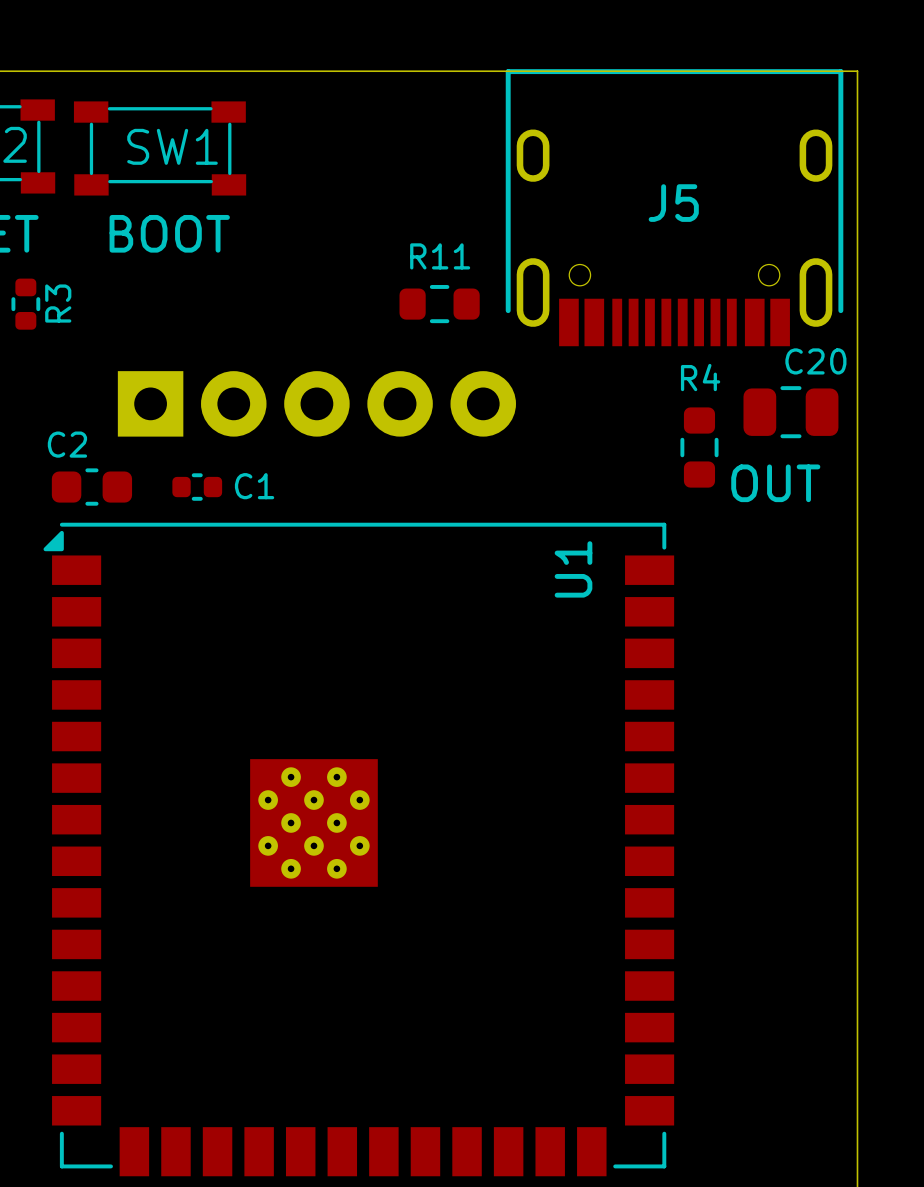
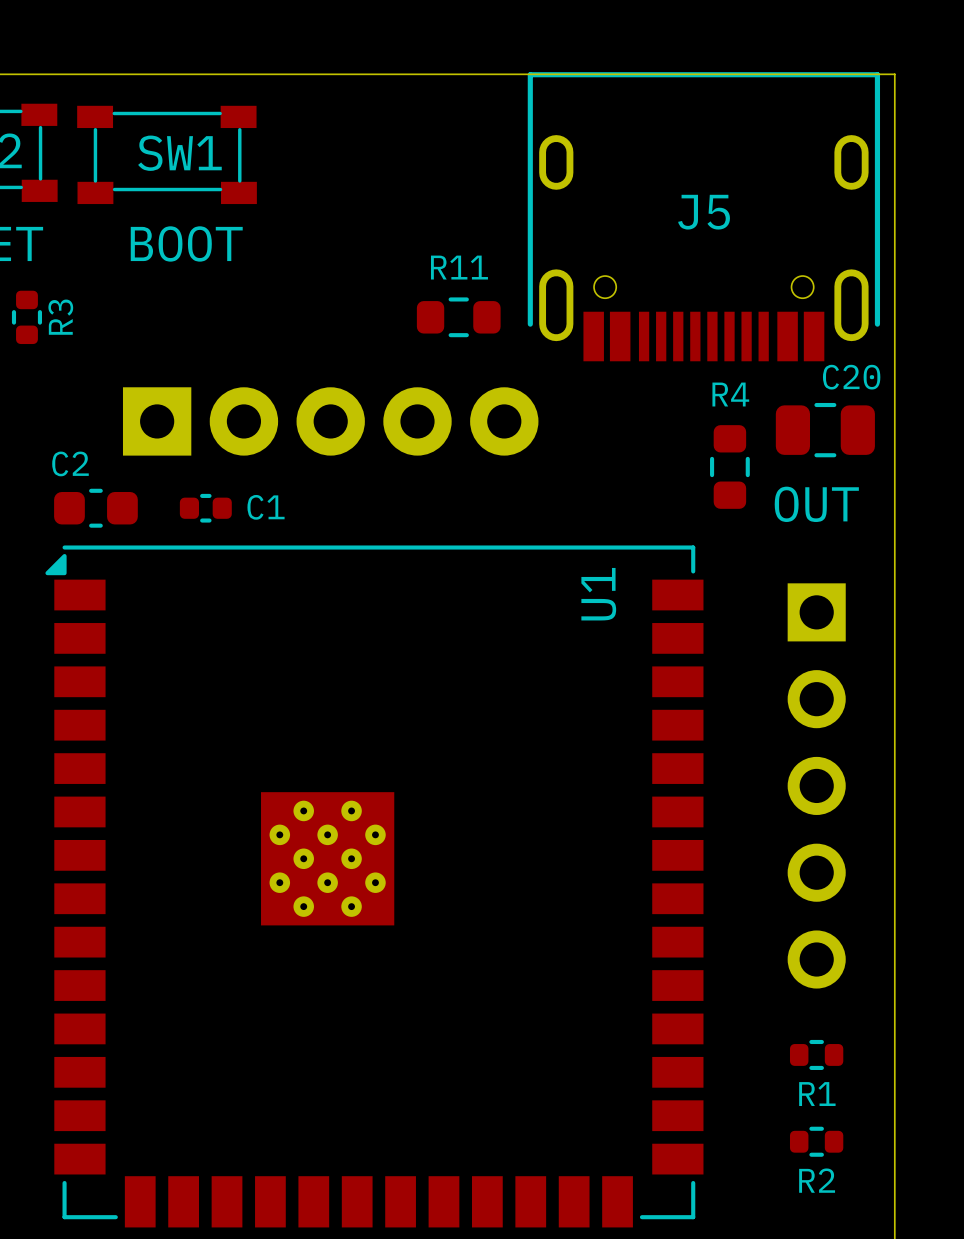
part: none -> (816, 785)
R1: none -> (816, 1054)
R2: none -> (816, 1141)

